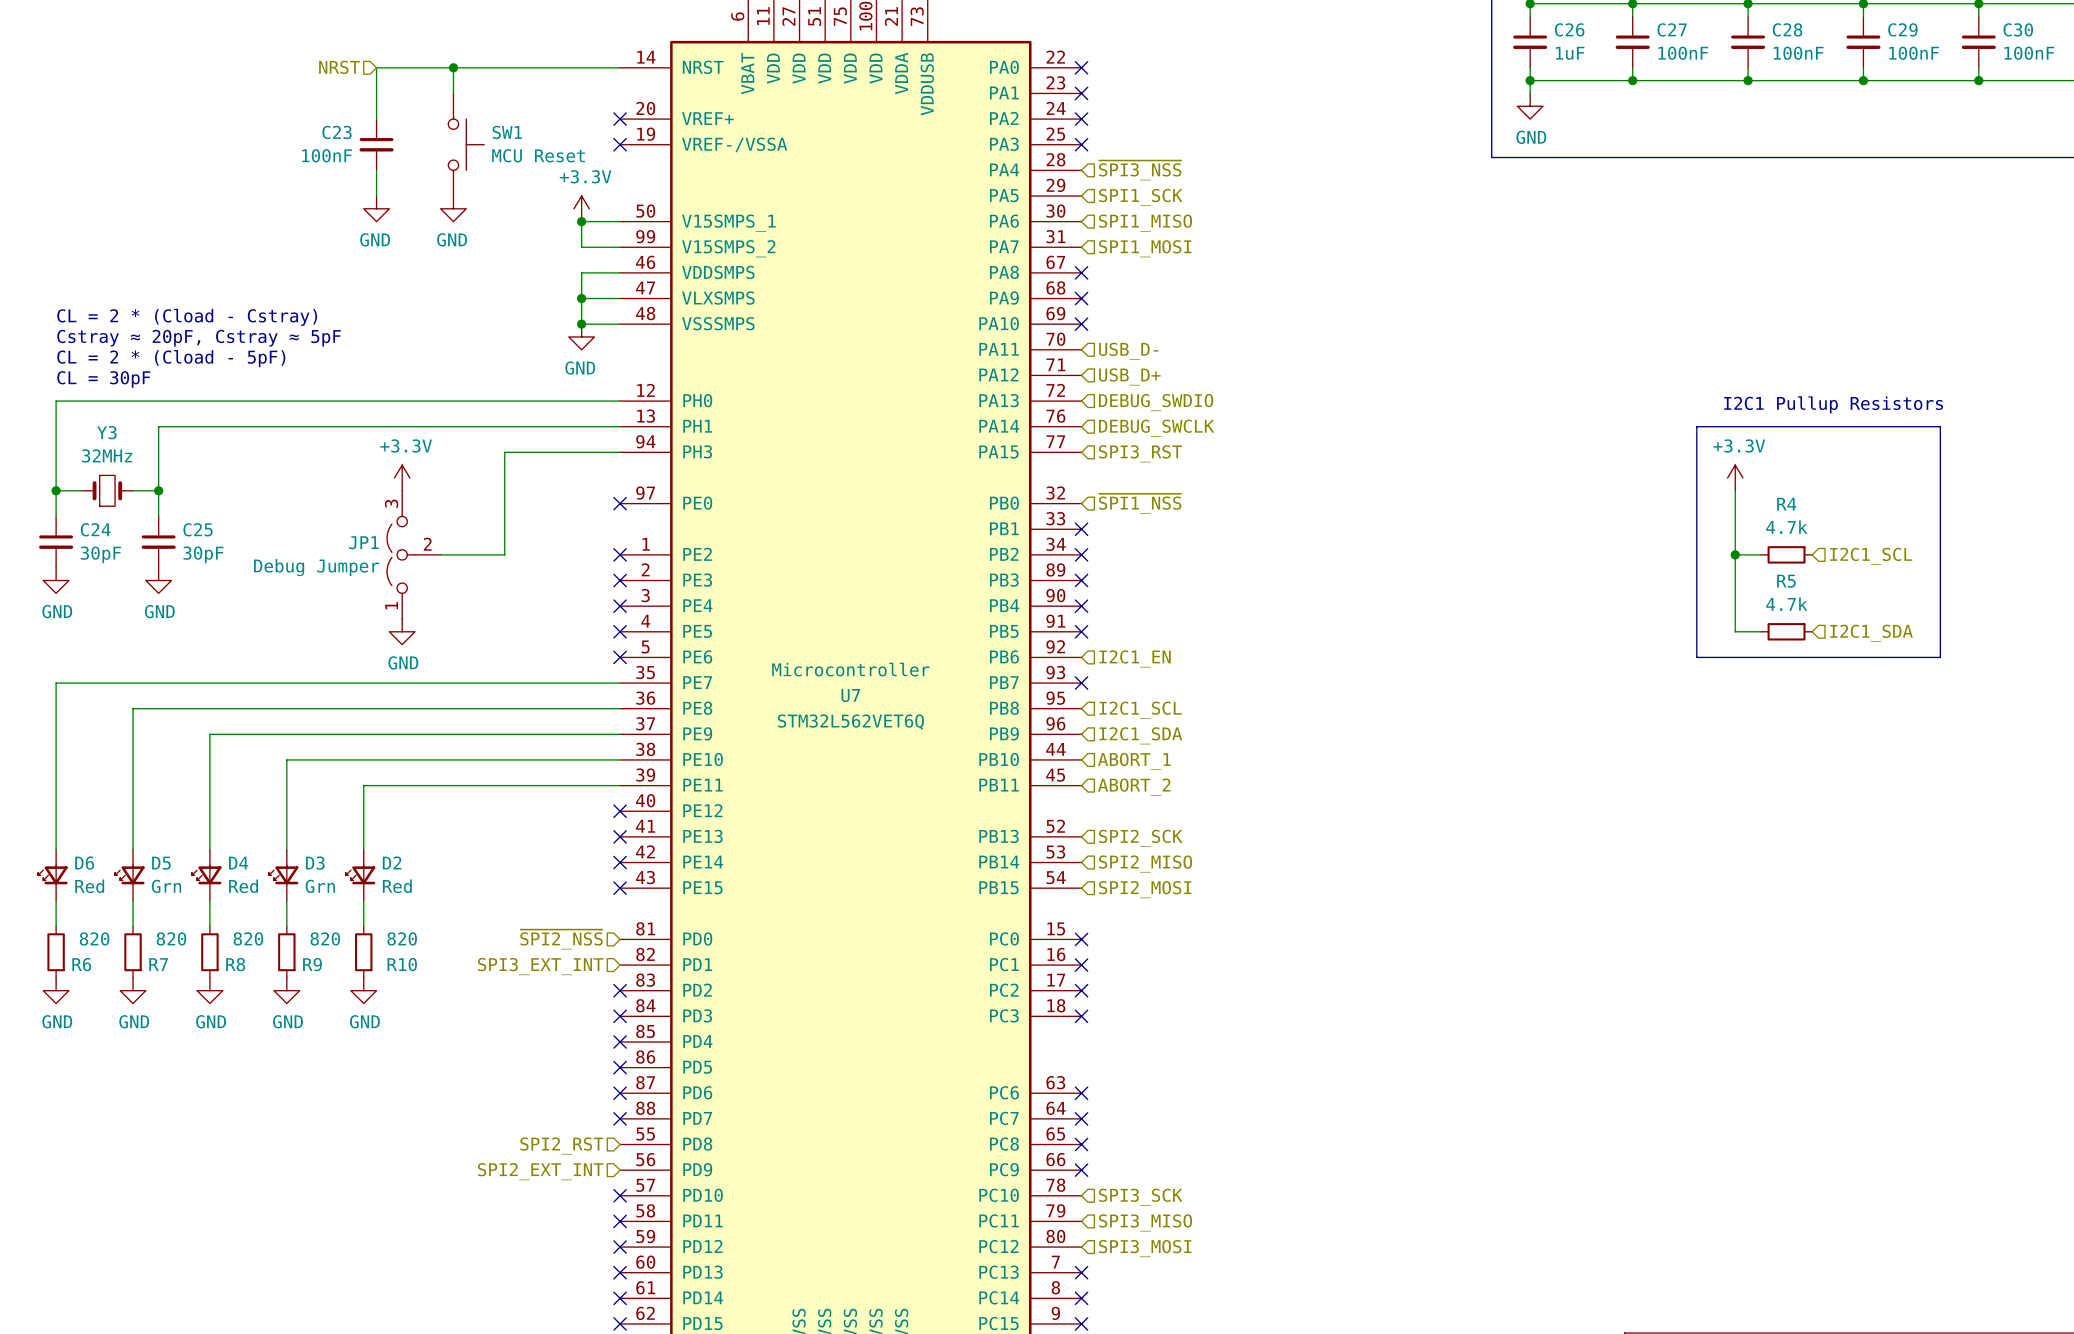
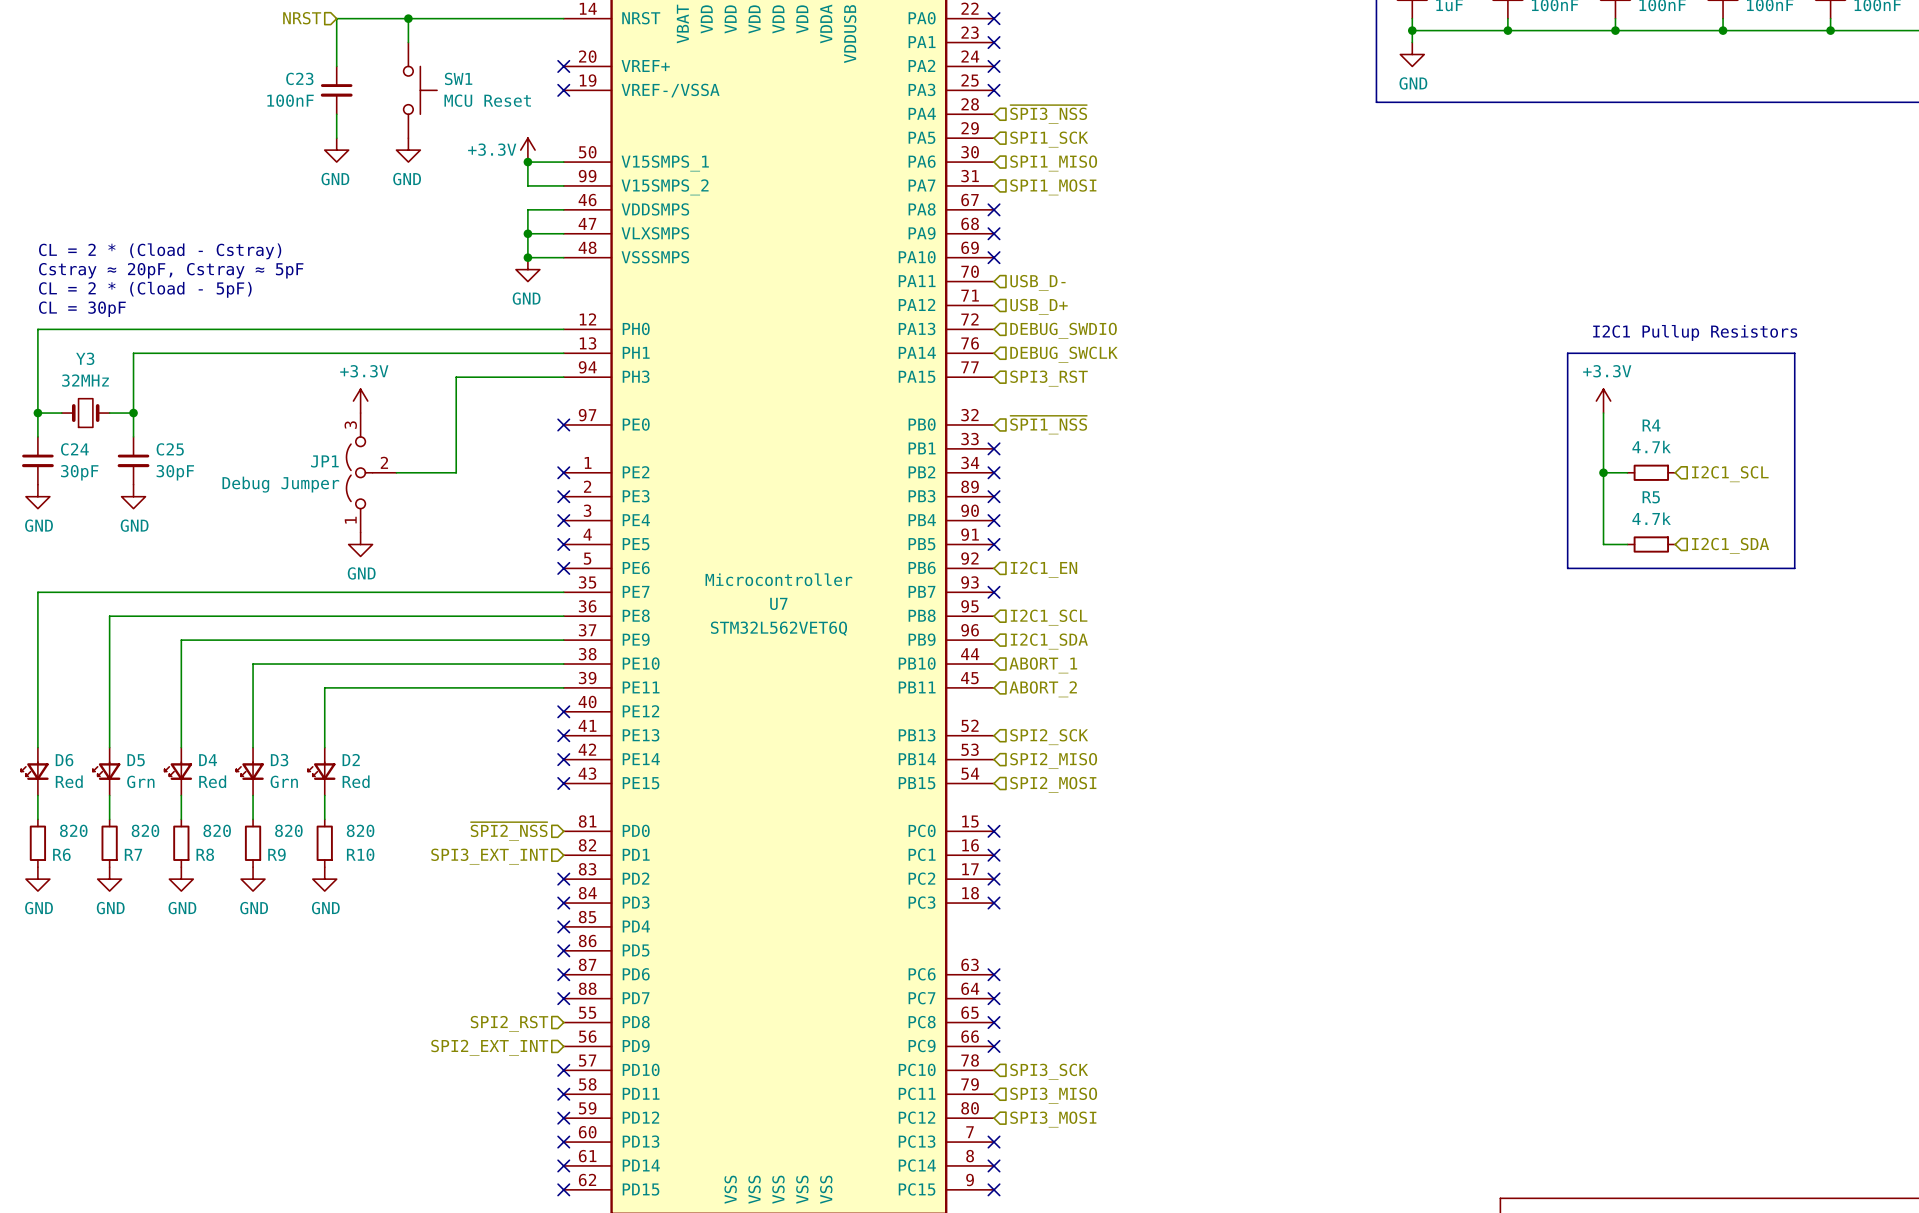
power symbol text position: +3.3V (585, 176) -> +3.3V (492, 149)

